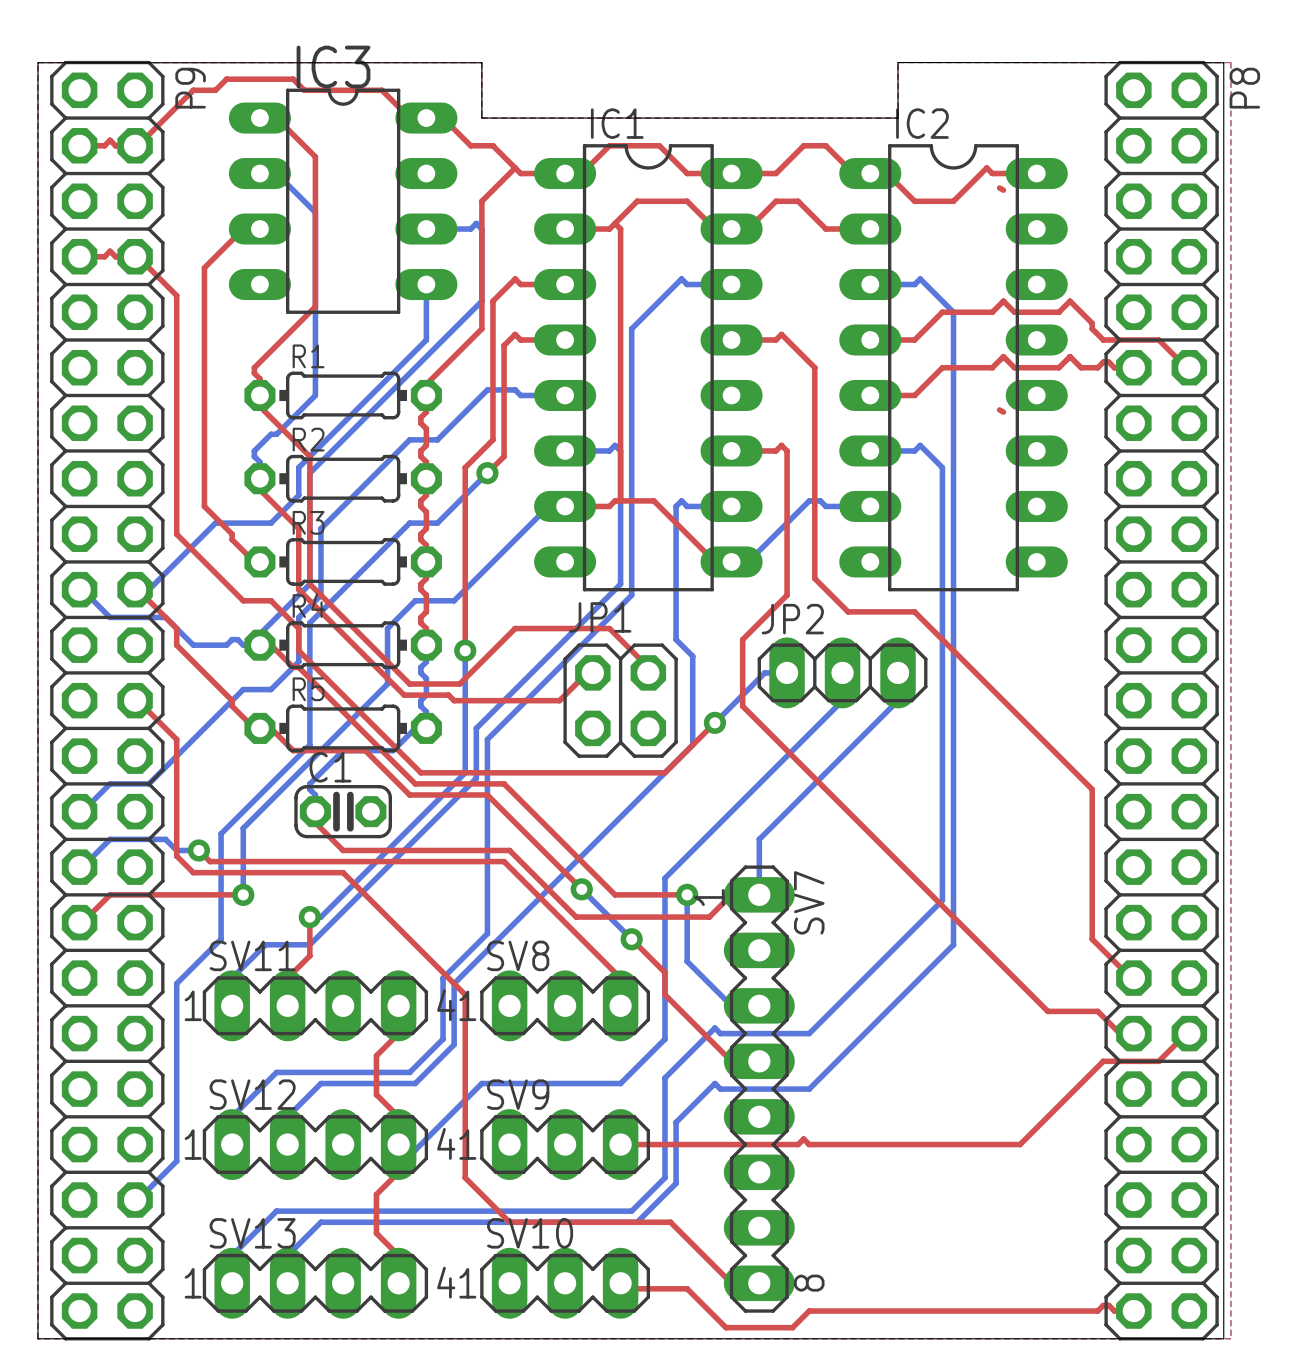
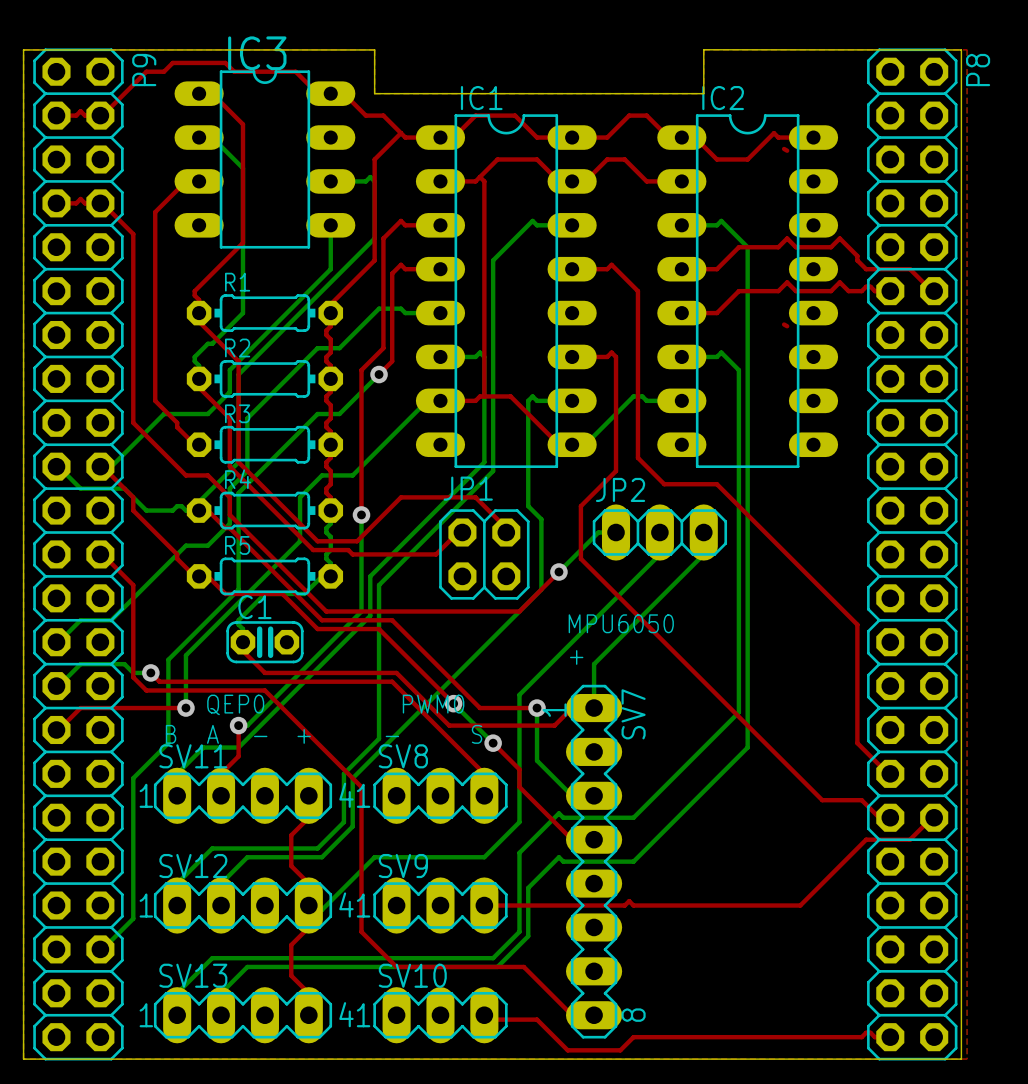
text: none -> MPU6050 (621, 623)
text: none -> + (576, 657)
text: none -> PWM0 (433, 704)
text: none -> QEP0 (235, 704)
text: none -> B (171, 734)
text: none -> A (212, 734)
text: none -> S (477, 734)
text: none -> - (260, 736)
text: none -> + (304, 736)
text: none -> - (392, 736)

